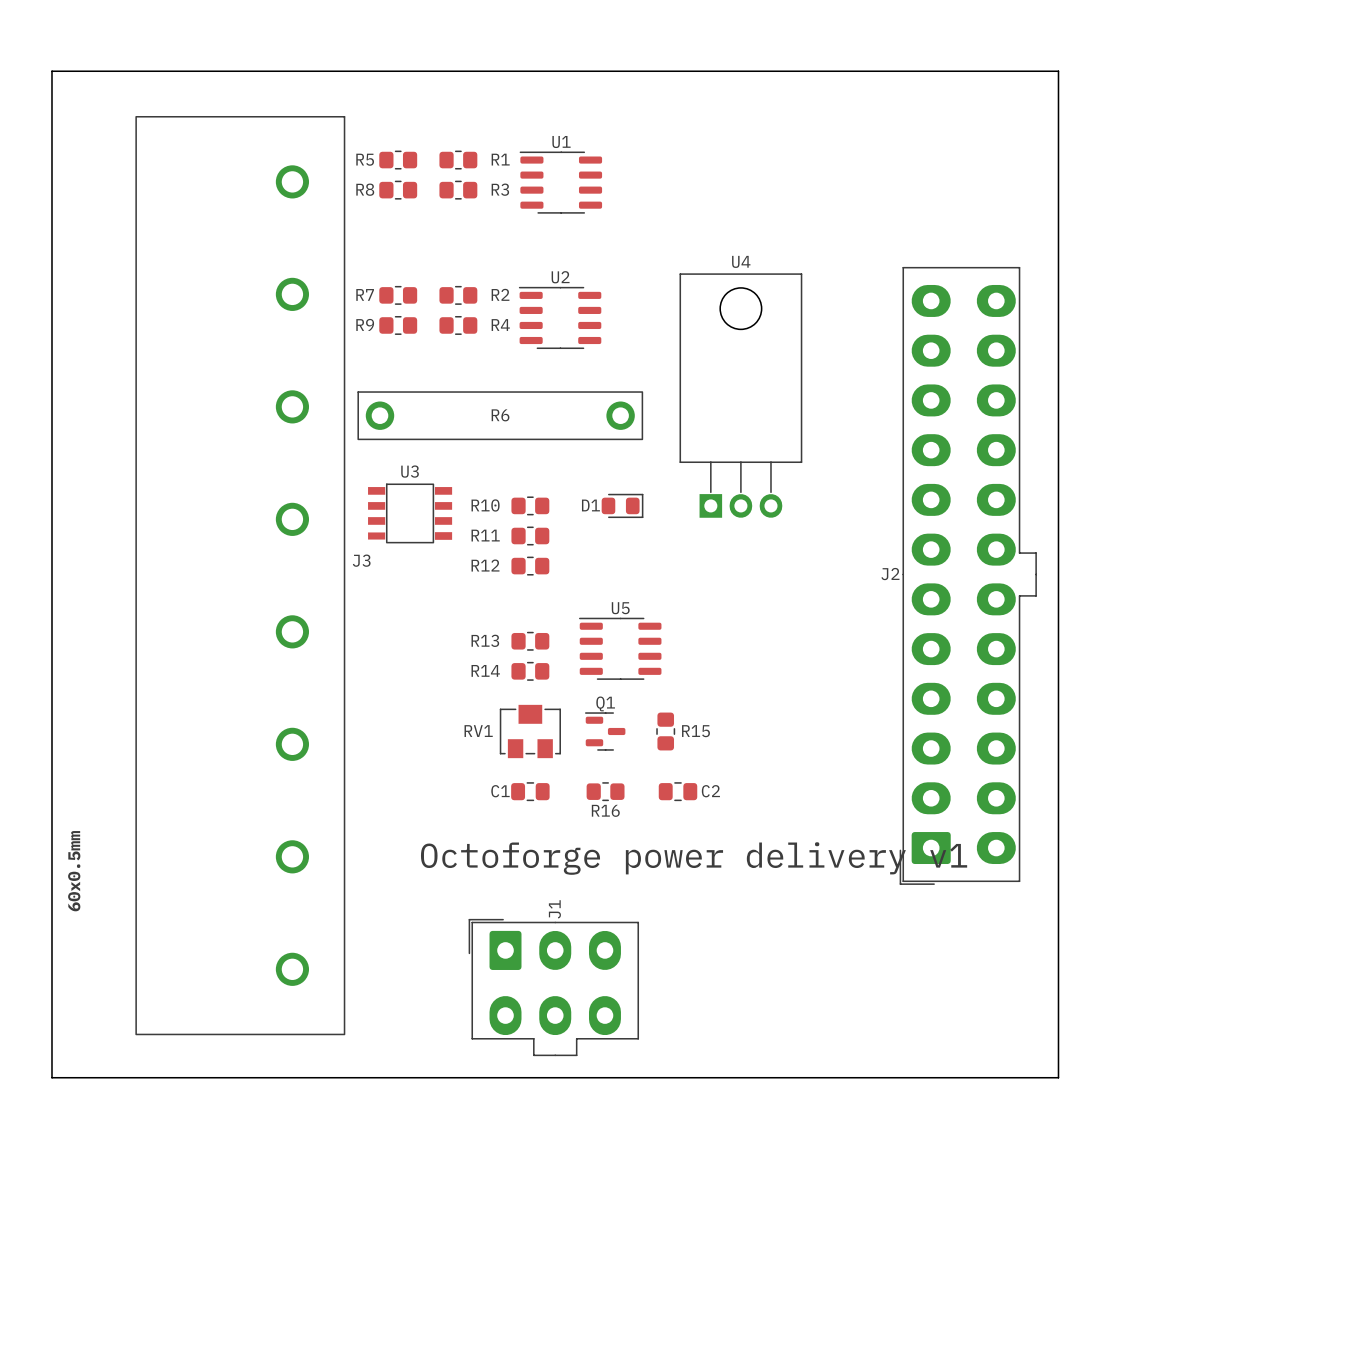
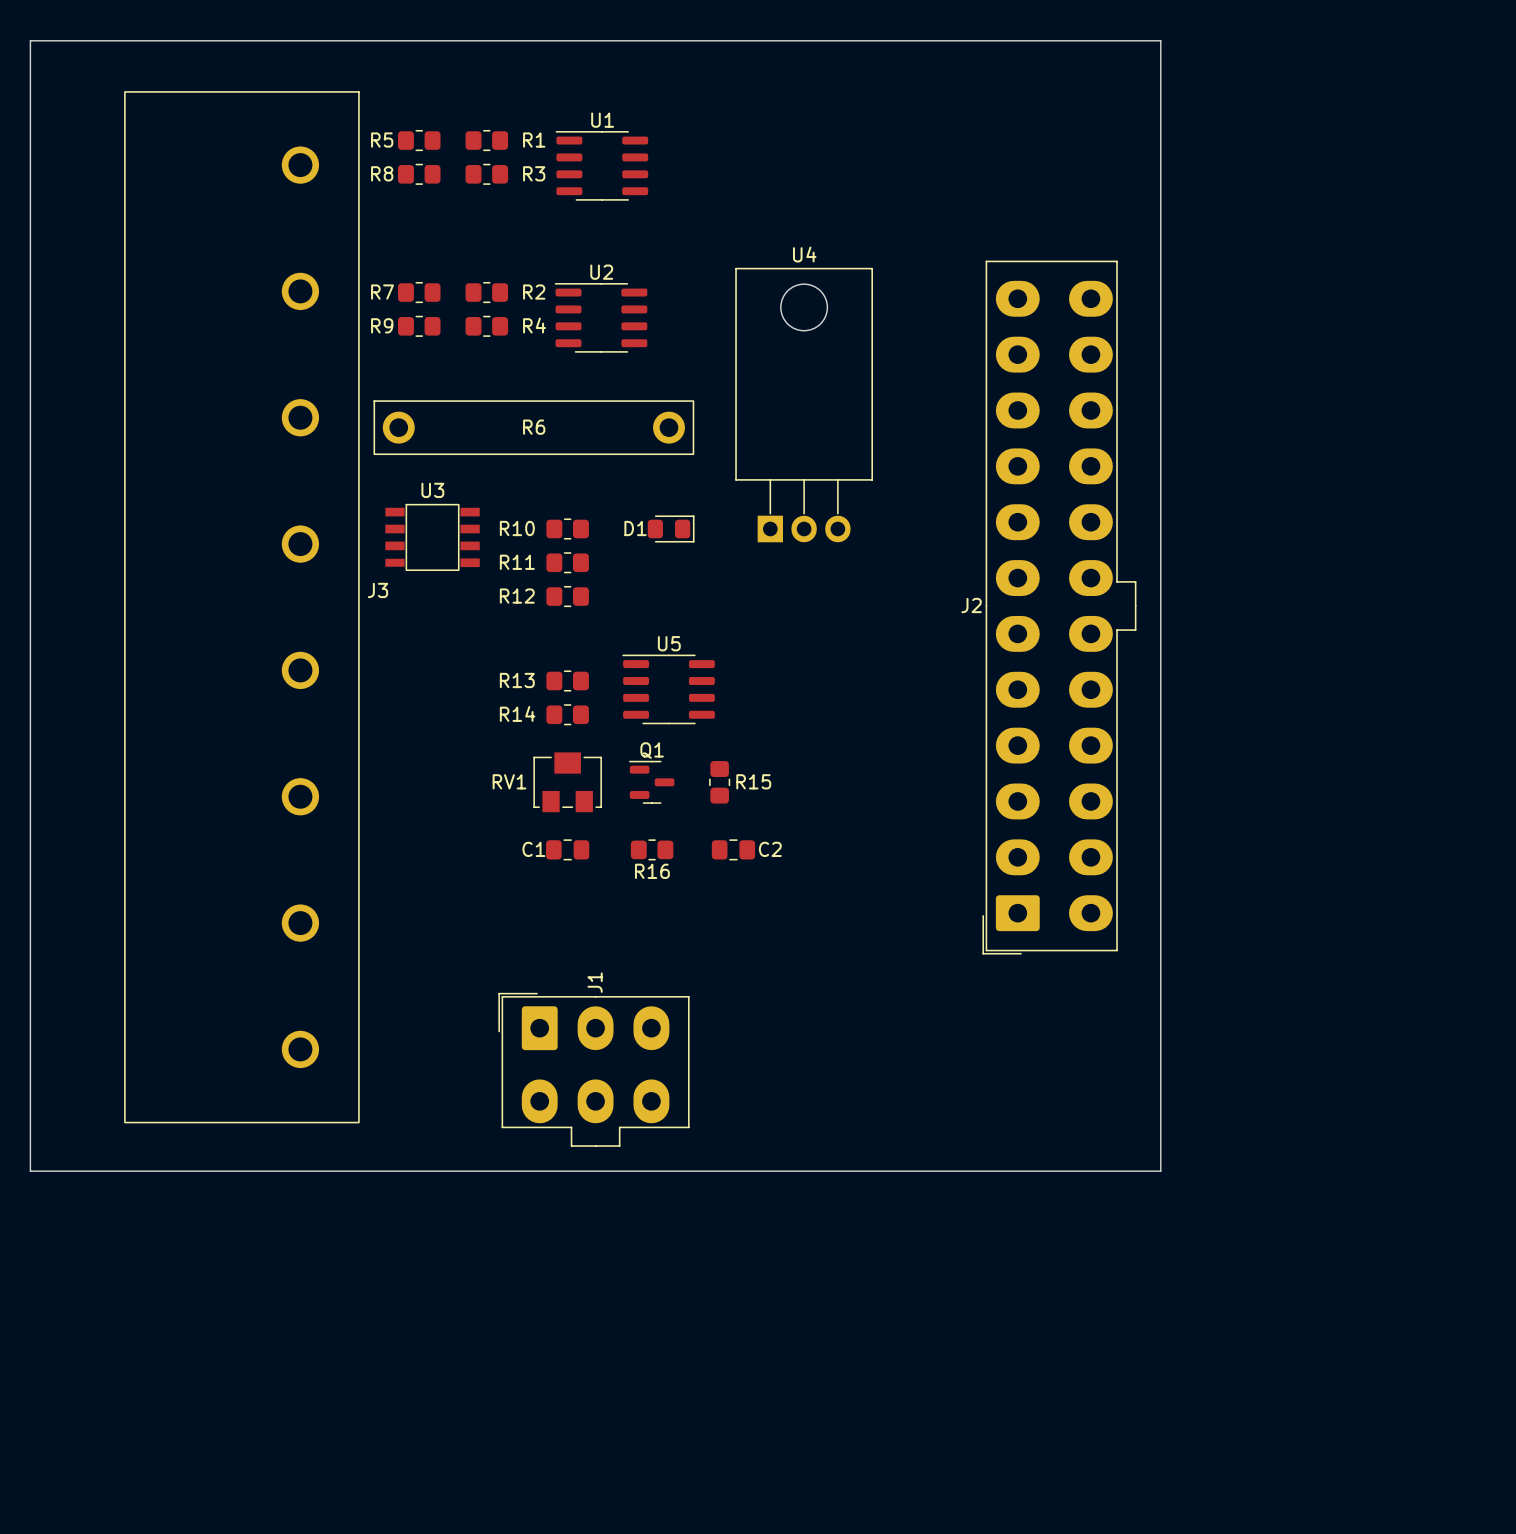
text: Octoforge power delivery v1 (694, 858) -> none
text: 60x0.5mm (74, 871) -> none

